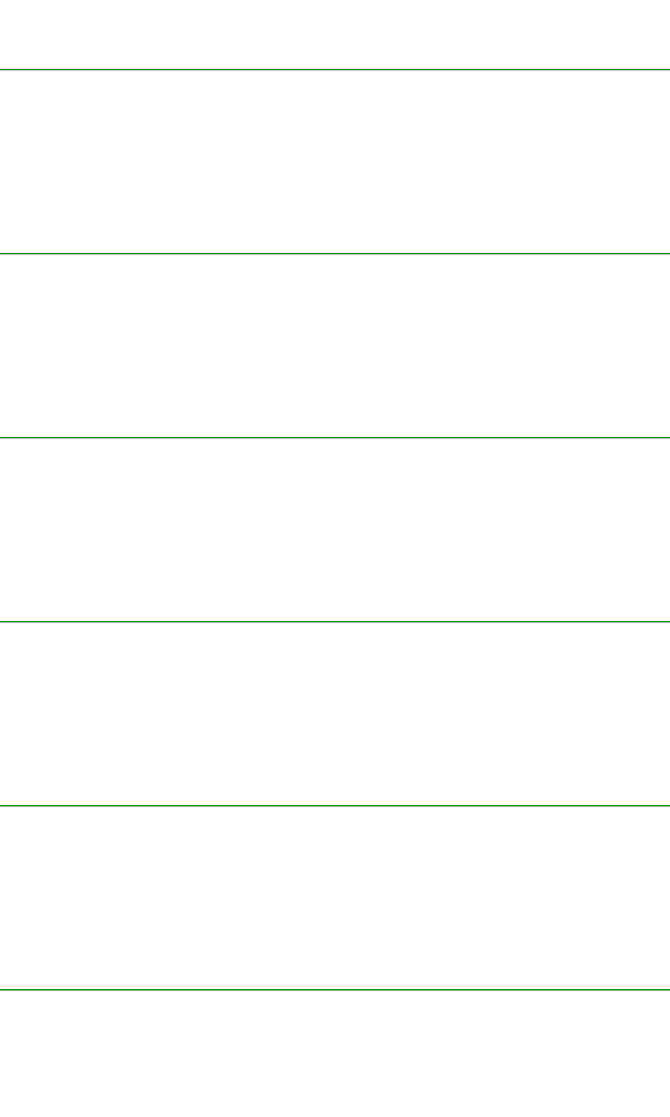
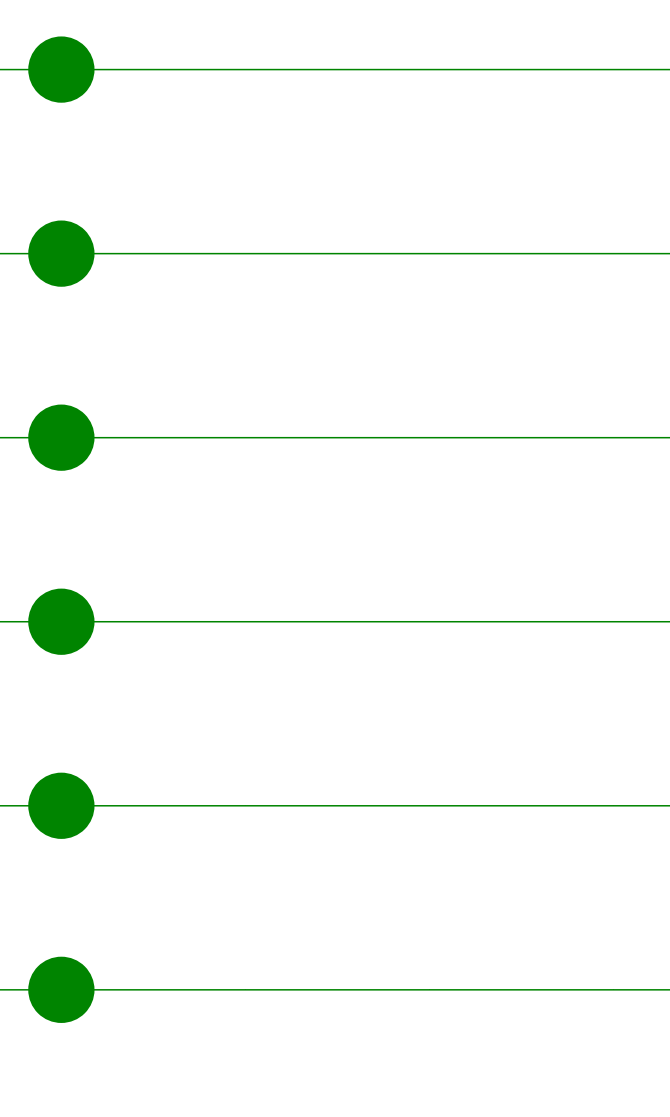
junction: none -> (61, 69)
junction: none -> (61, 253)
junction: none -> (61, 437)
junction: none -> (61, 621)
junction: none -> (61, 805)
junction: none -> (61, 989)

